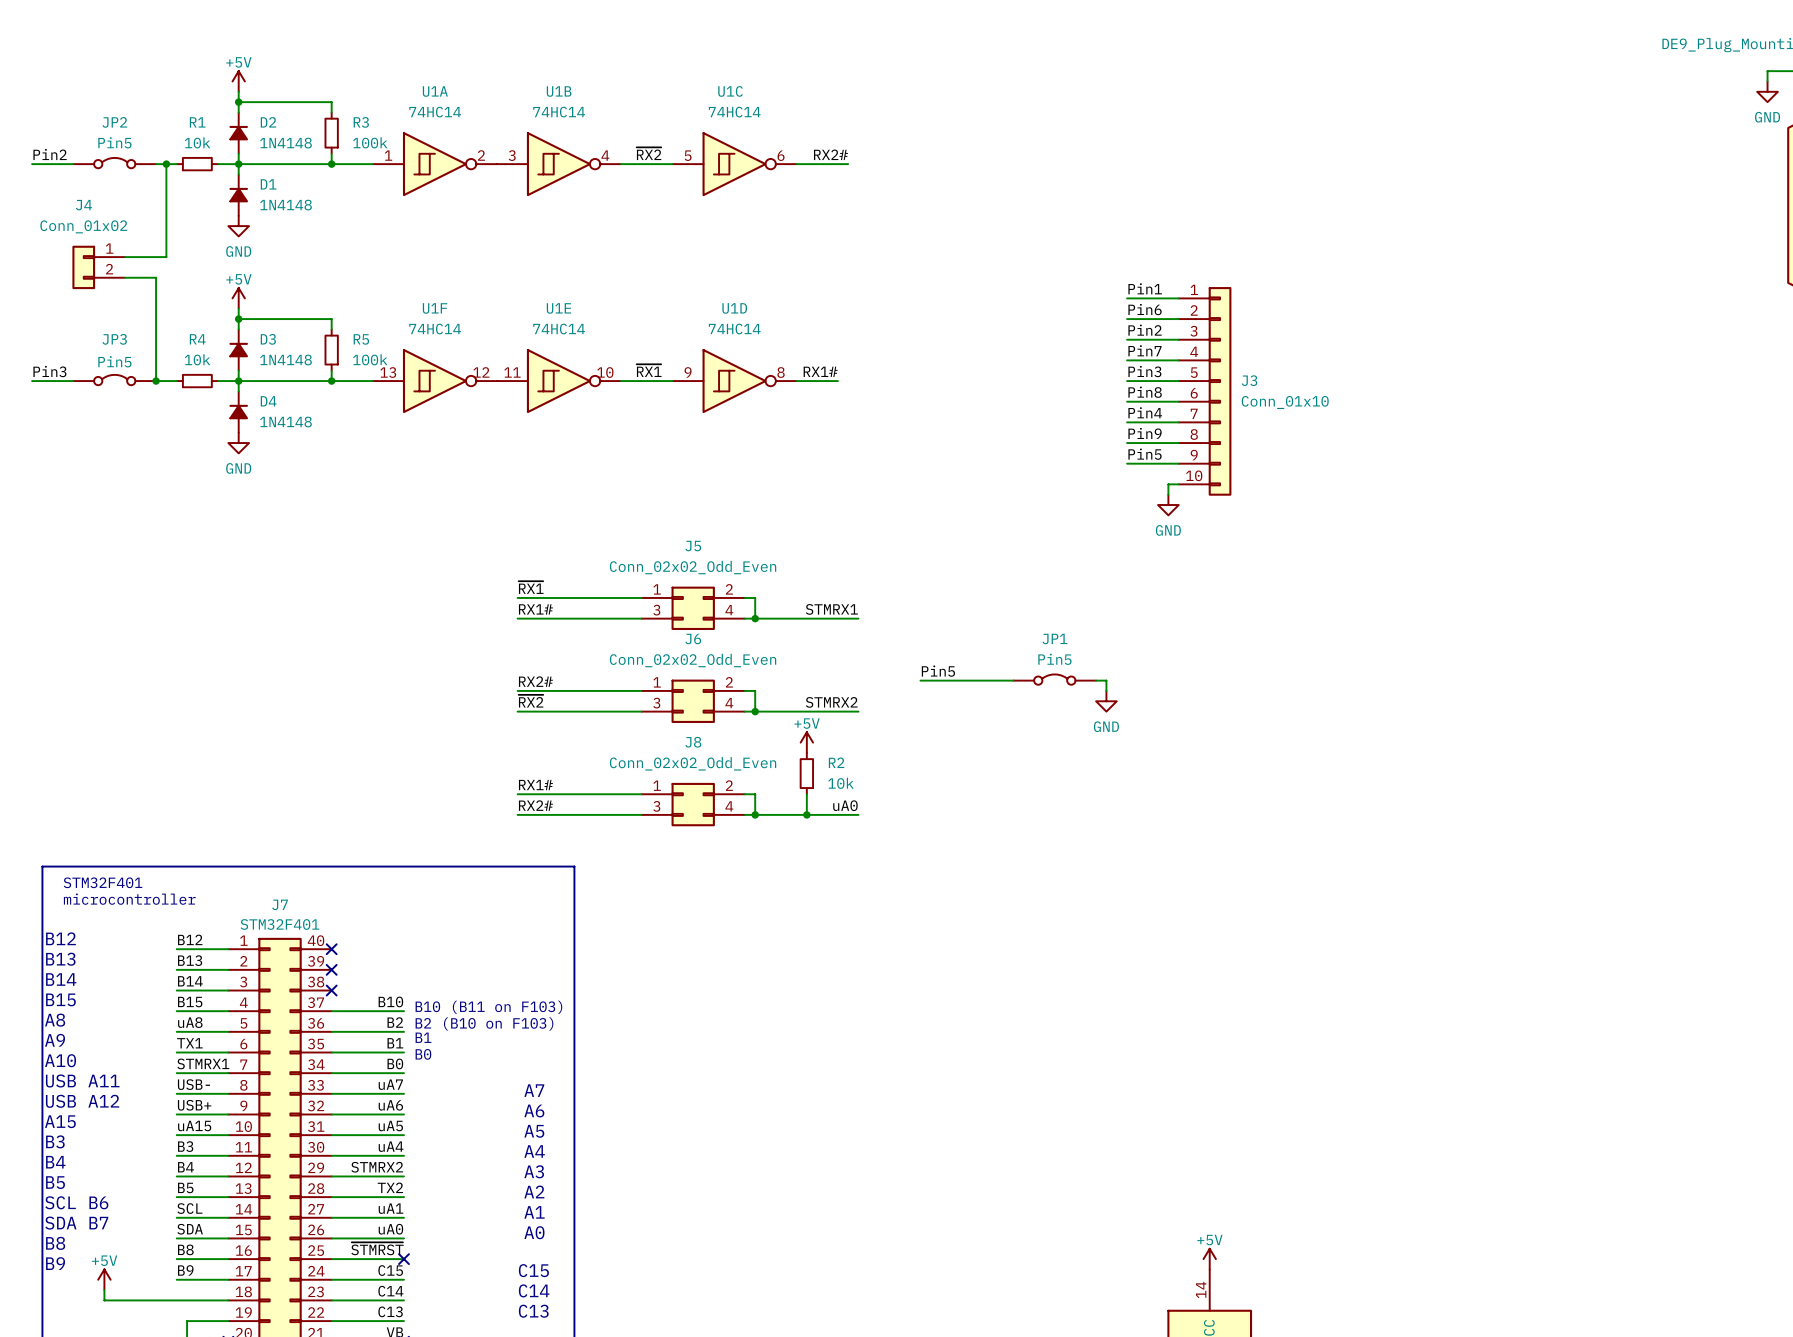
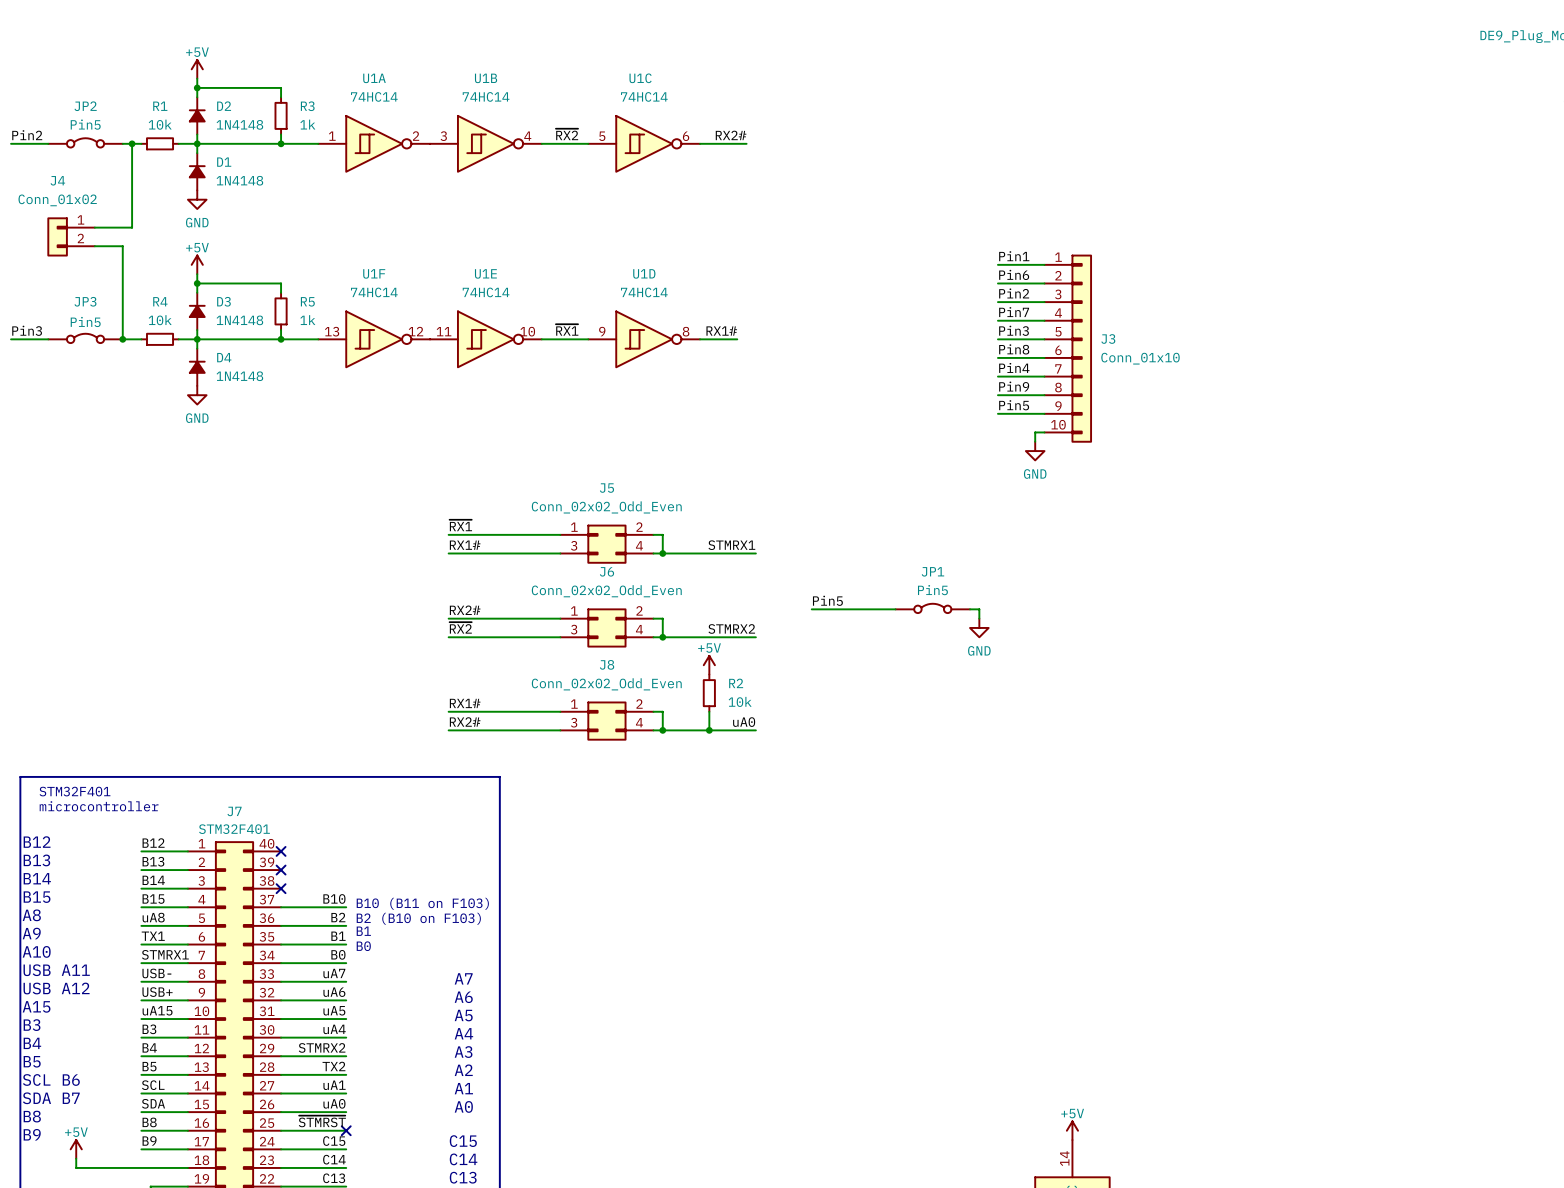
R3 value: 100k (370, 142) -> 1k (307, 124)
R5 value: 100k (370, 359) -> 1k (307, 320)

